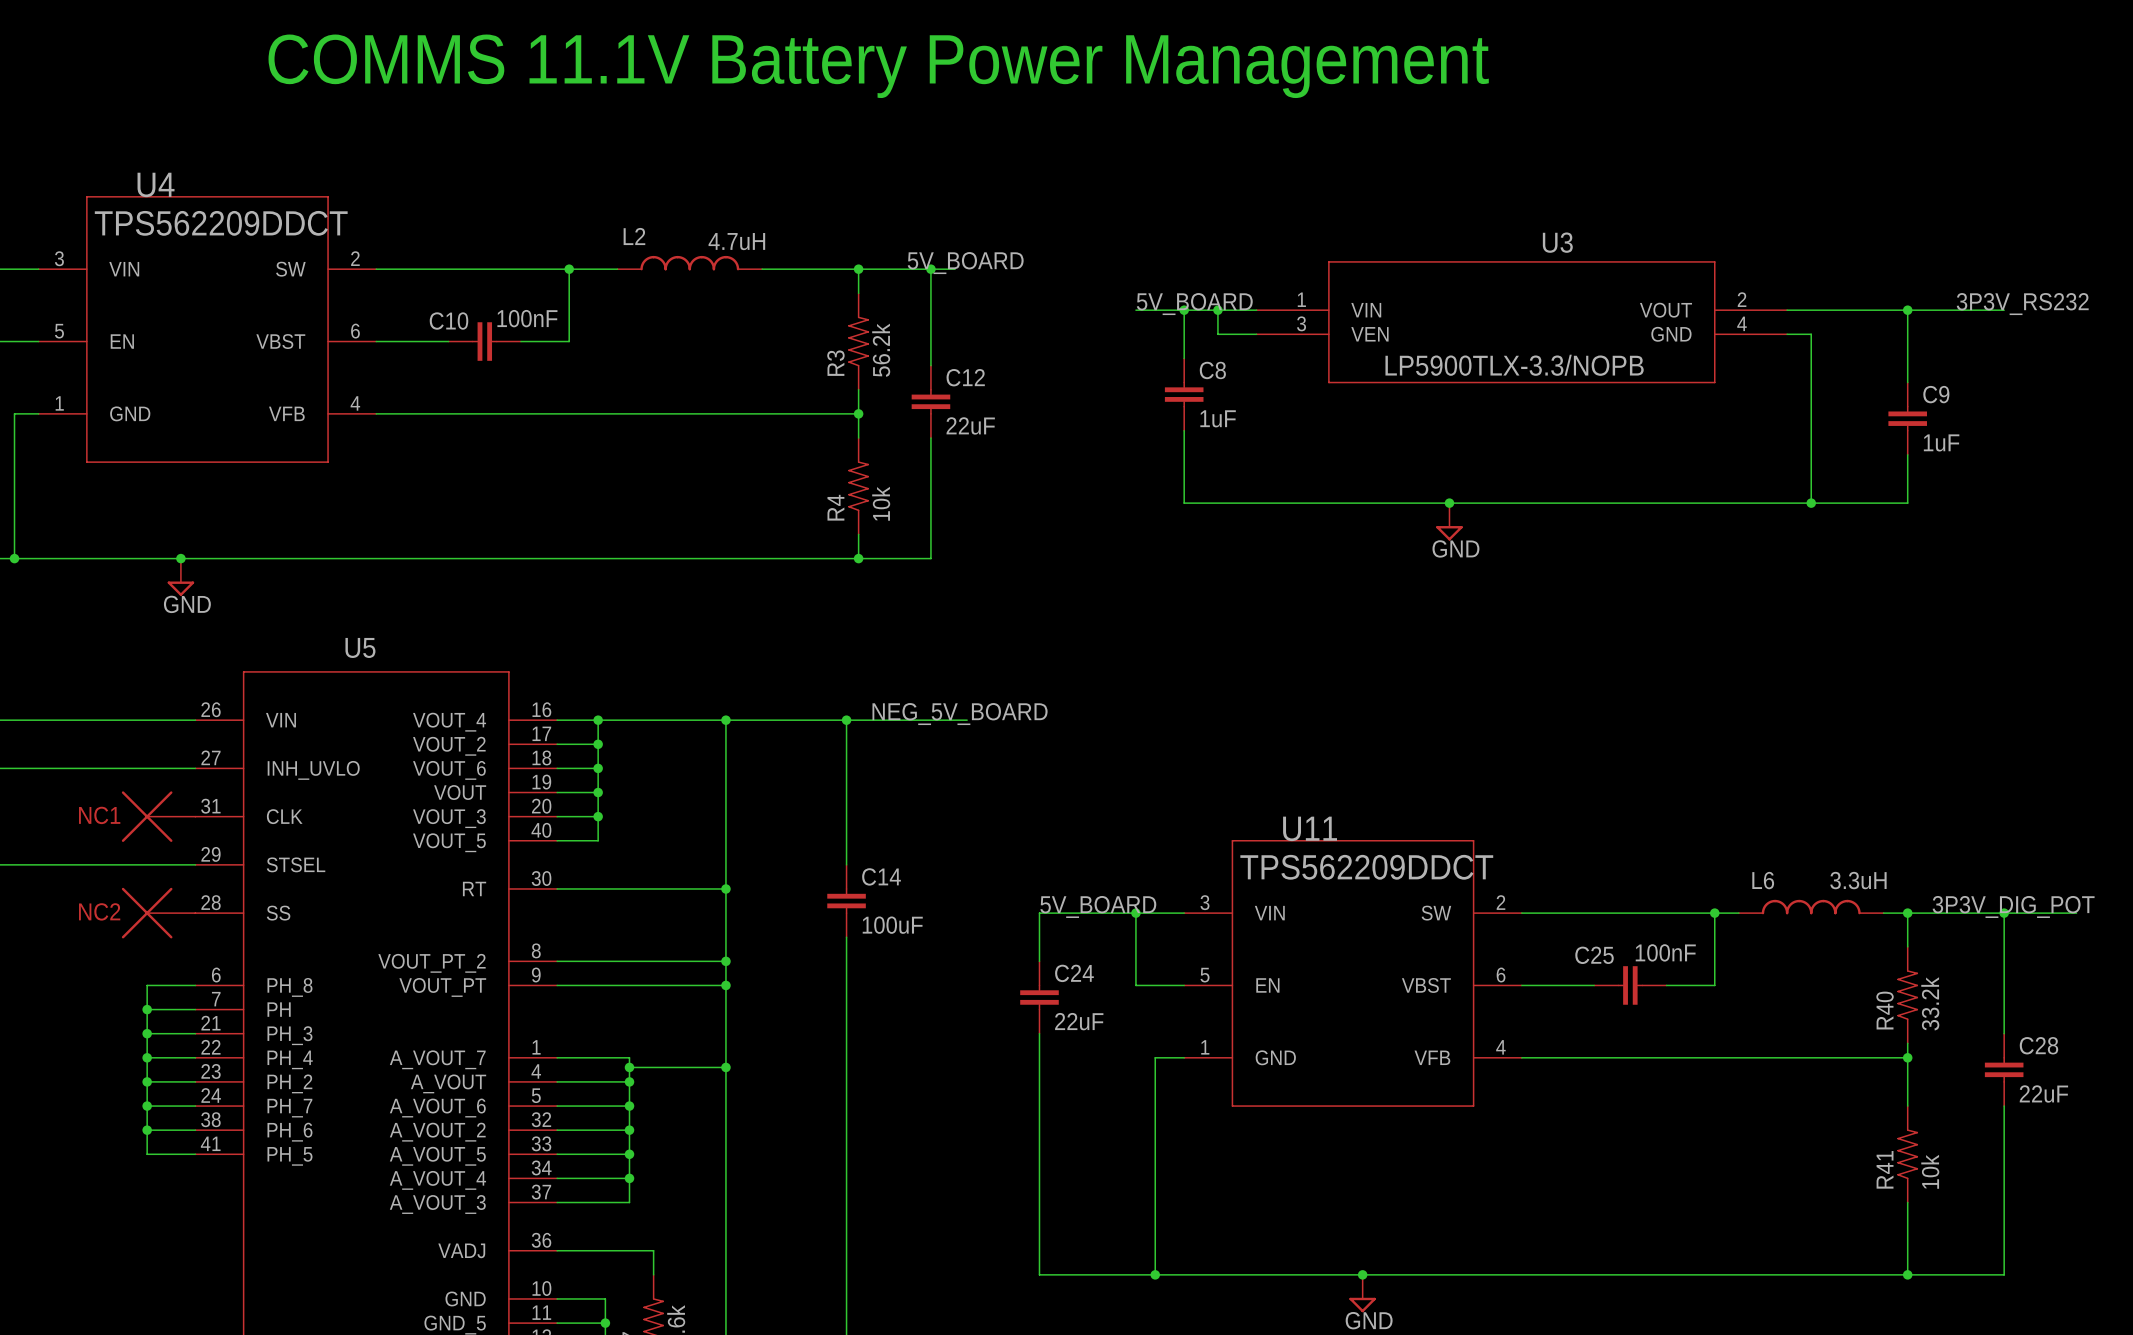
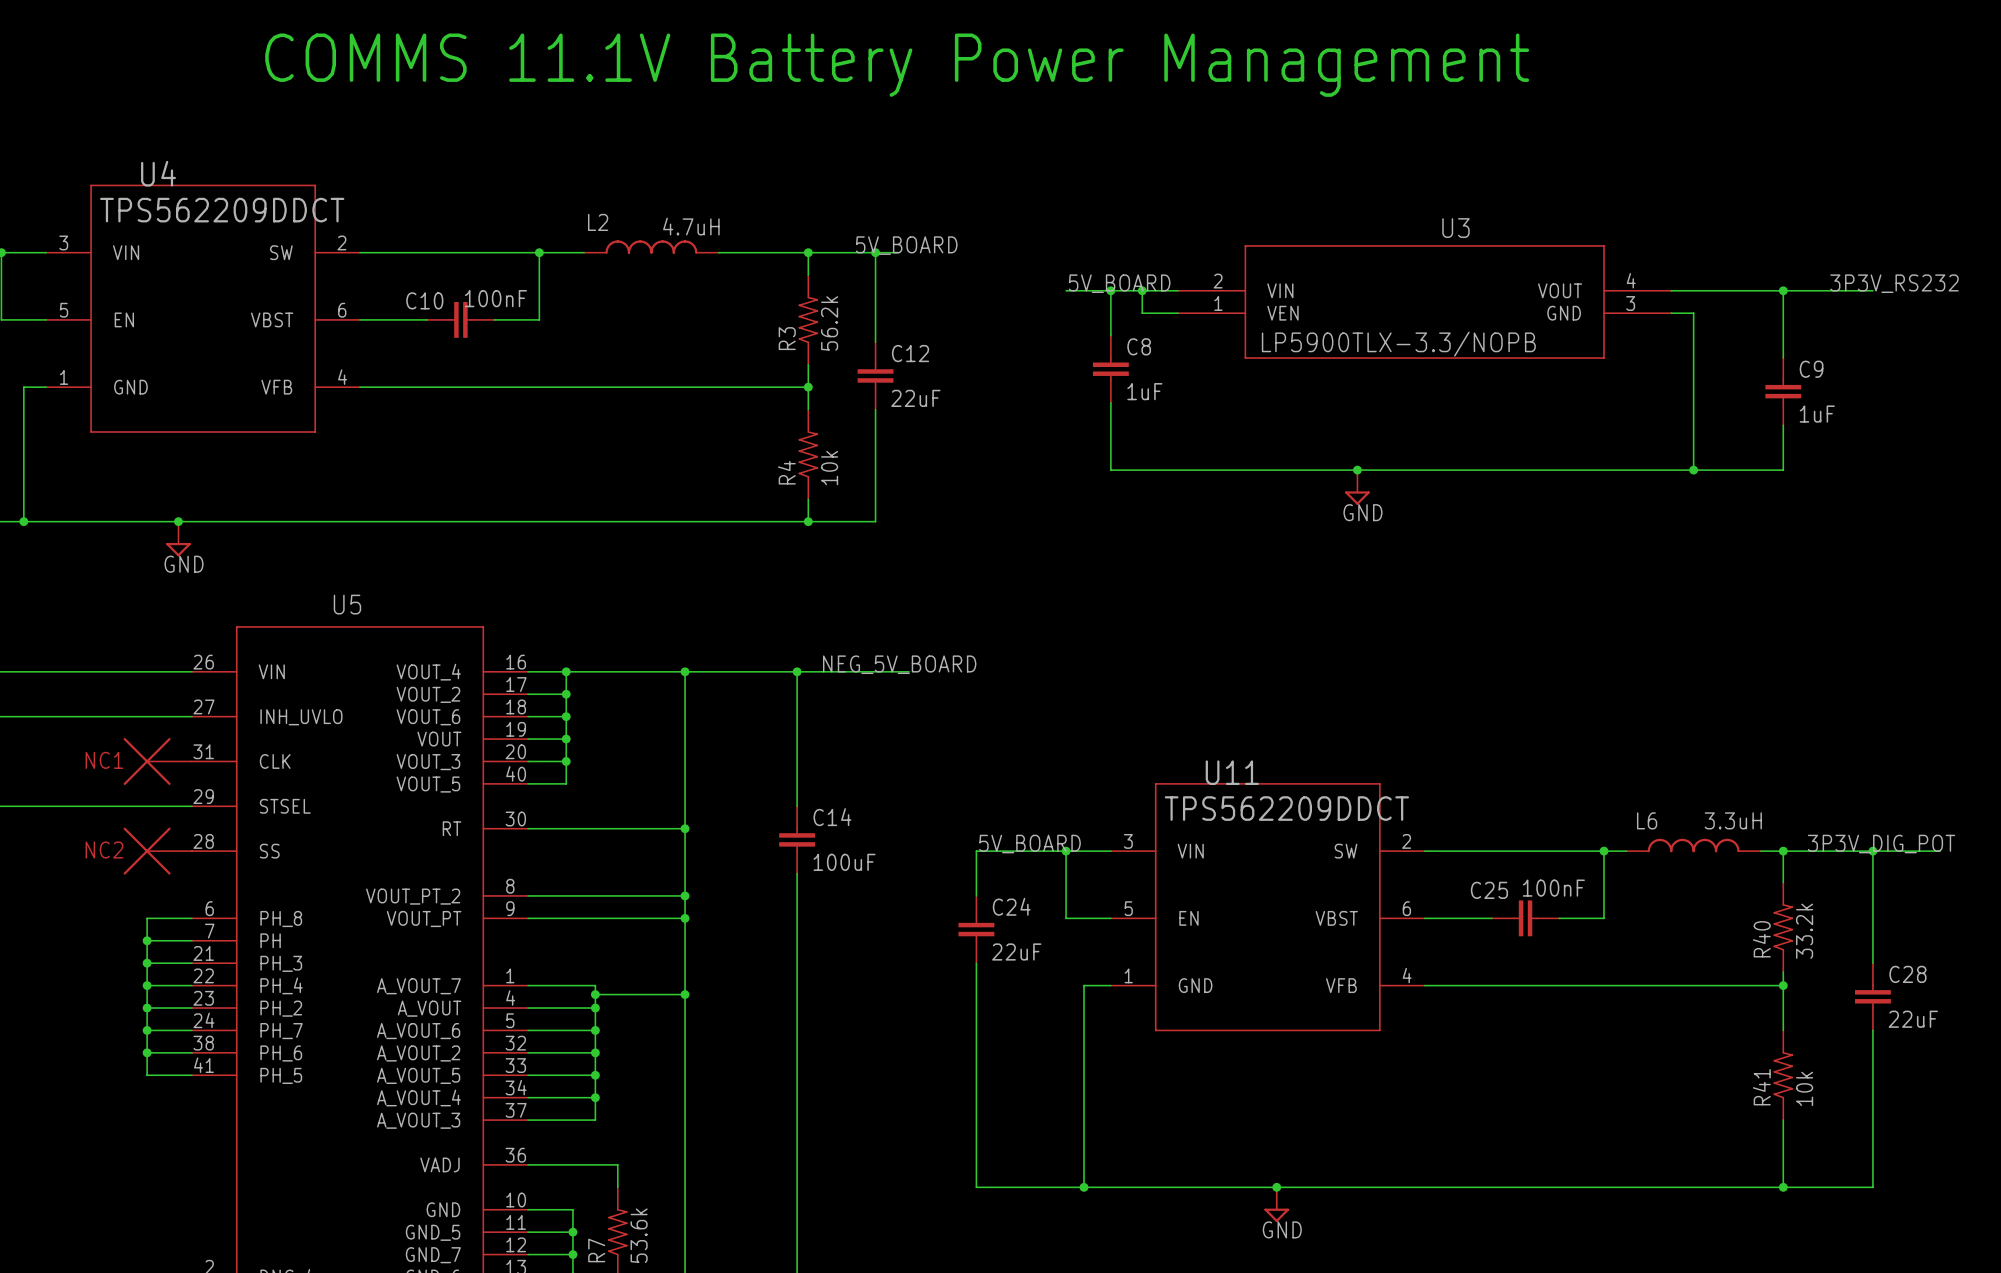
U3 pin number: 1 (1301, 299) -> 2 (1218, 281)
U3 pin number: 2 (1742, 299) -> 4 (1631, 280)
U3 pin number: 3 (1301, 323) -> 1 (1218, 303)
U3 pin number: 4 (1742, 323) -> 3 (1630, 303)

